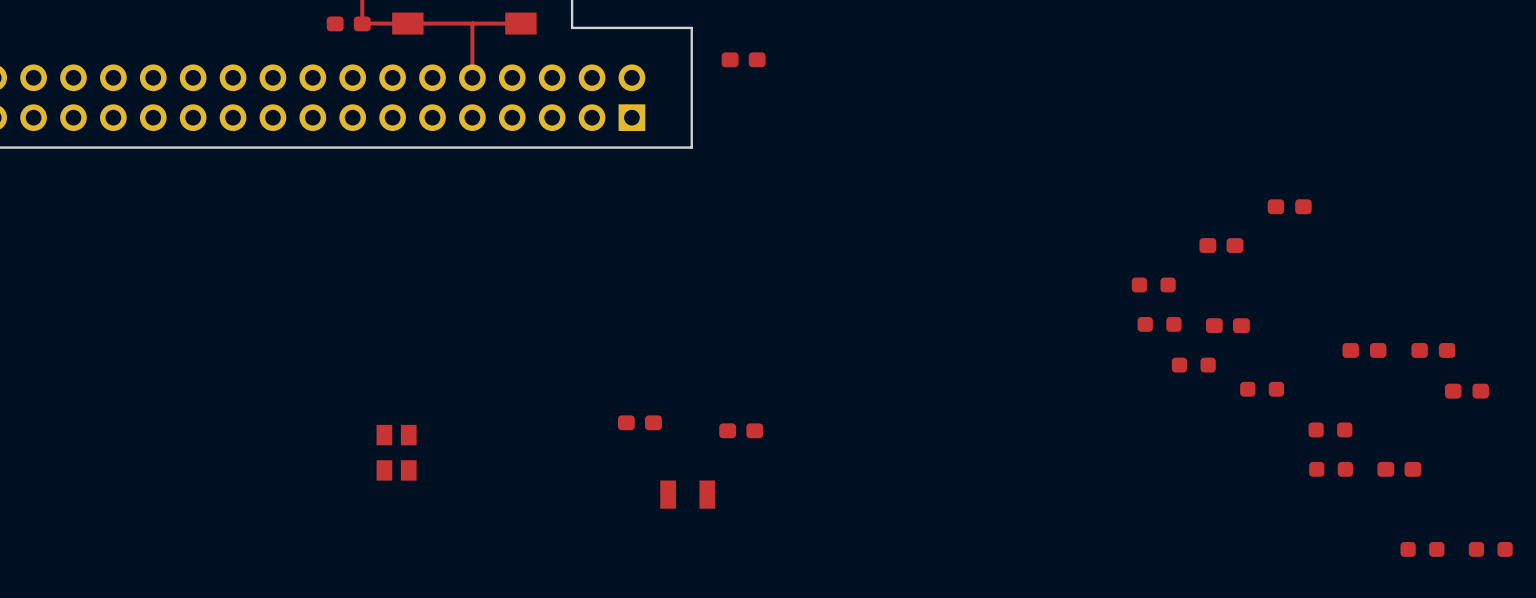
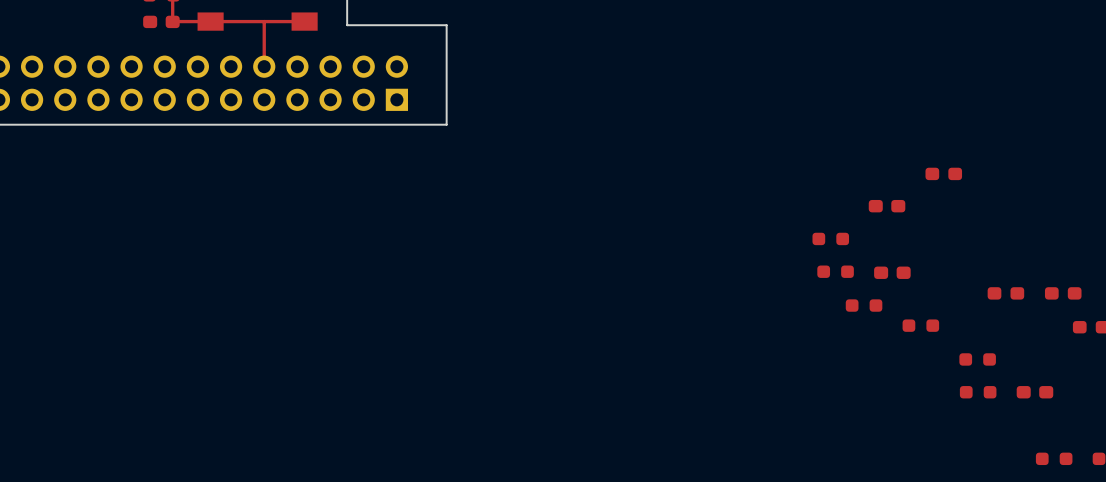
part: (743, 59) -> none
part: (639, 422) -> none
part: (741, 430) -> none
part: (396, 452) -> none
part: (687, 494) -> none

